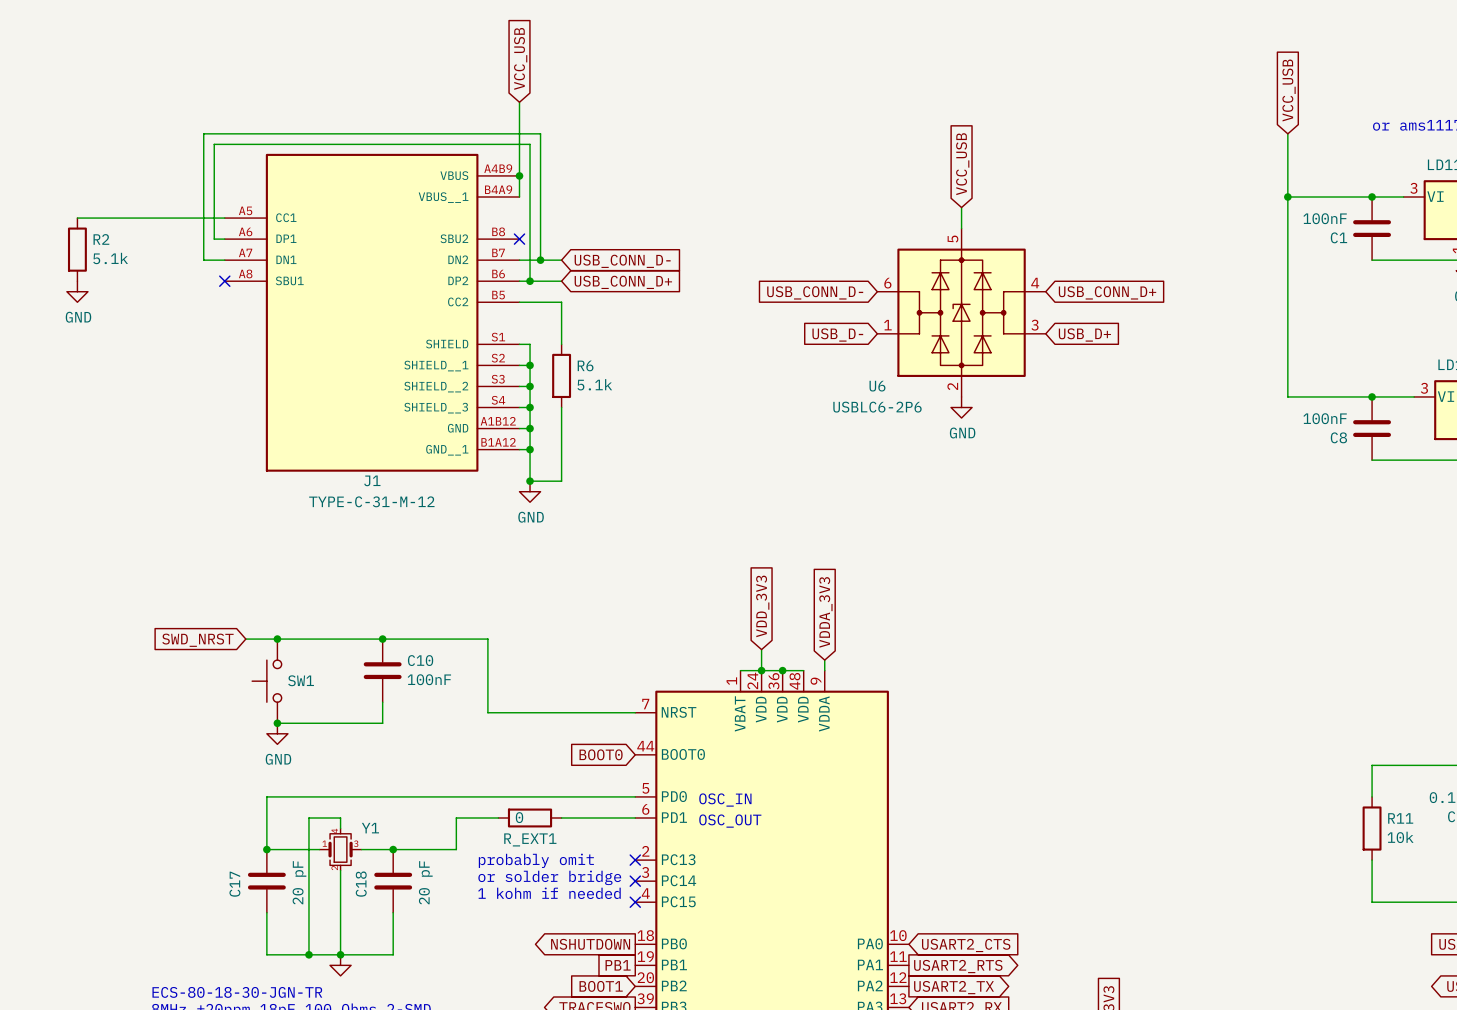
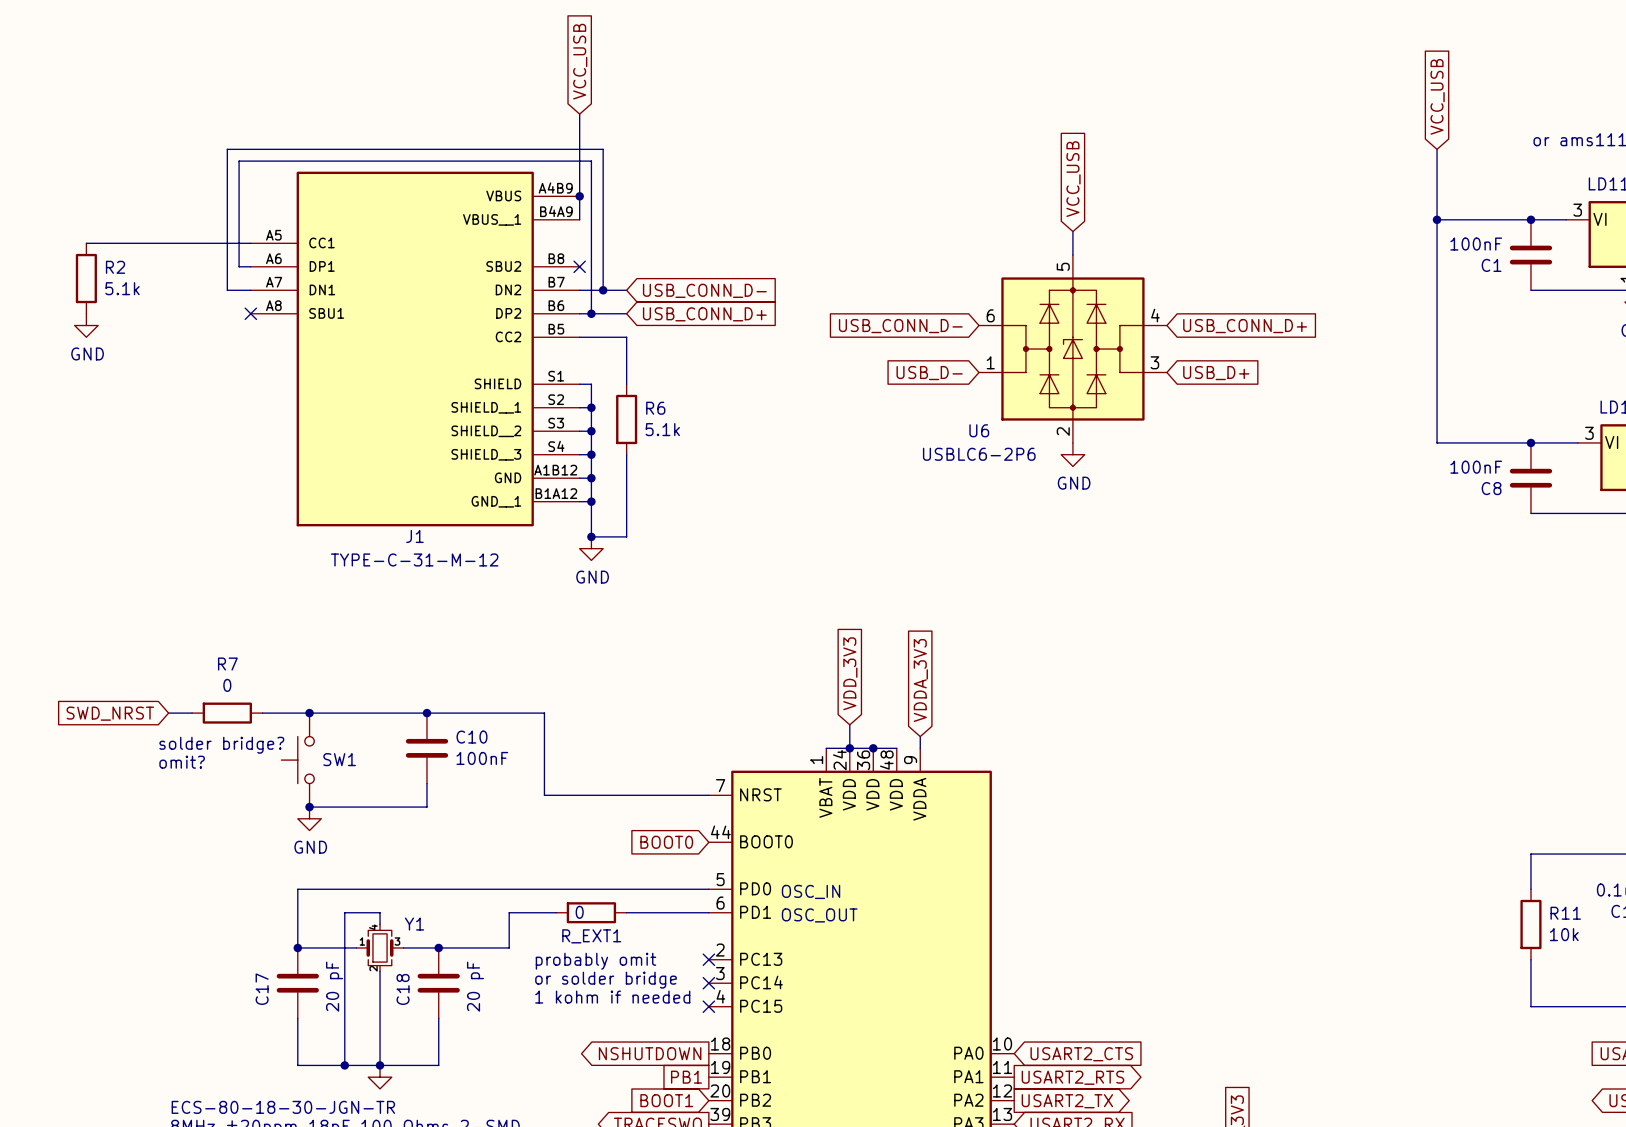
wire: none -> (168, 713) (192, 713)
R7: none -> 0 (227, 713)
wire: none -> (262, 713) (274, 713)
global label position: SWD_NRST (197, 640) -> SWD_NRST (110, 713)
text: none -> solder bridge? (221, 745)
text: none -> omit? (182, 762)

